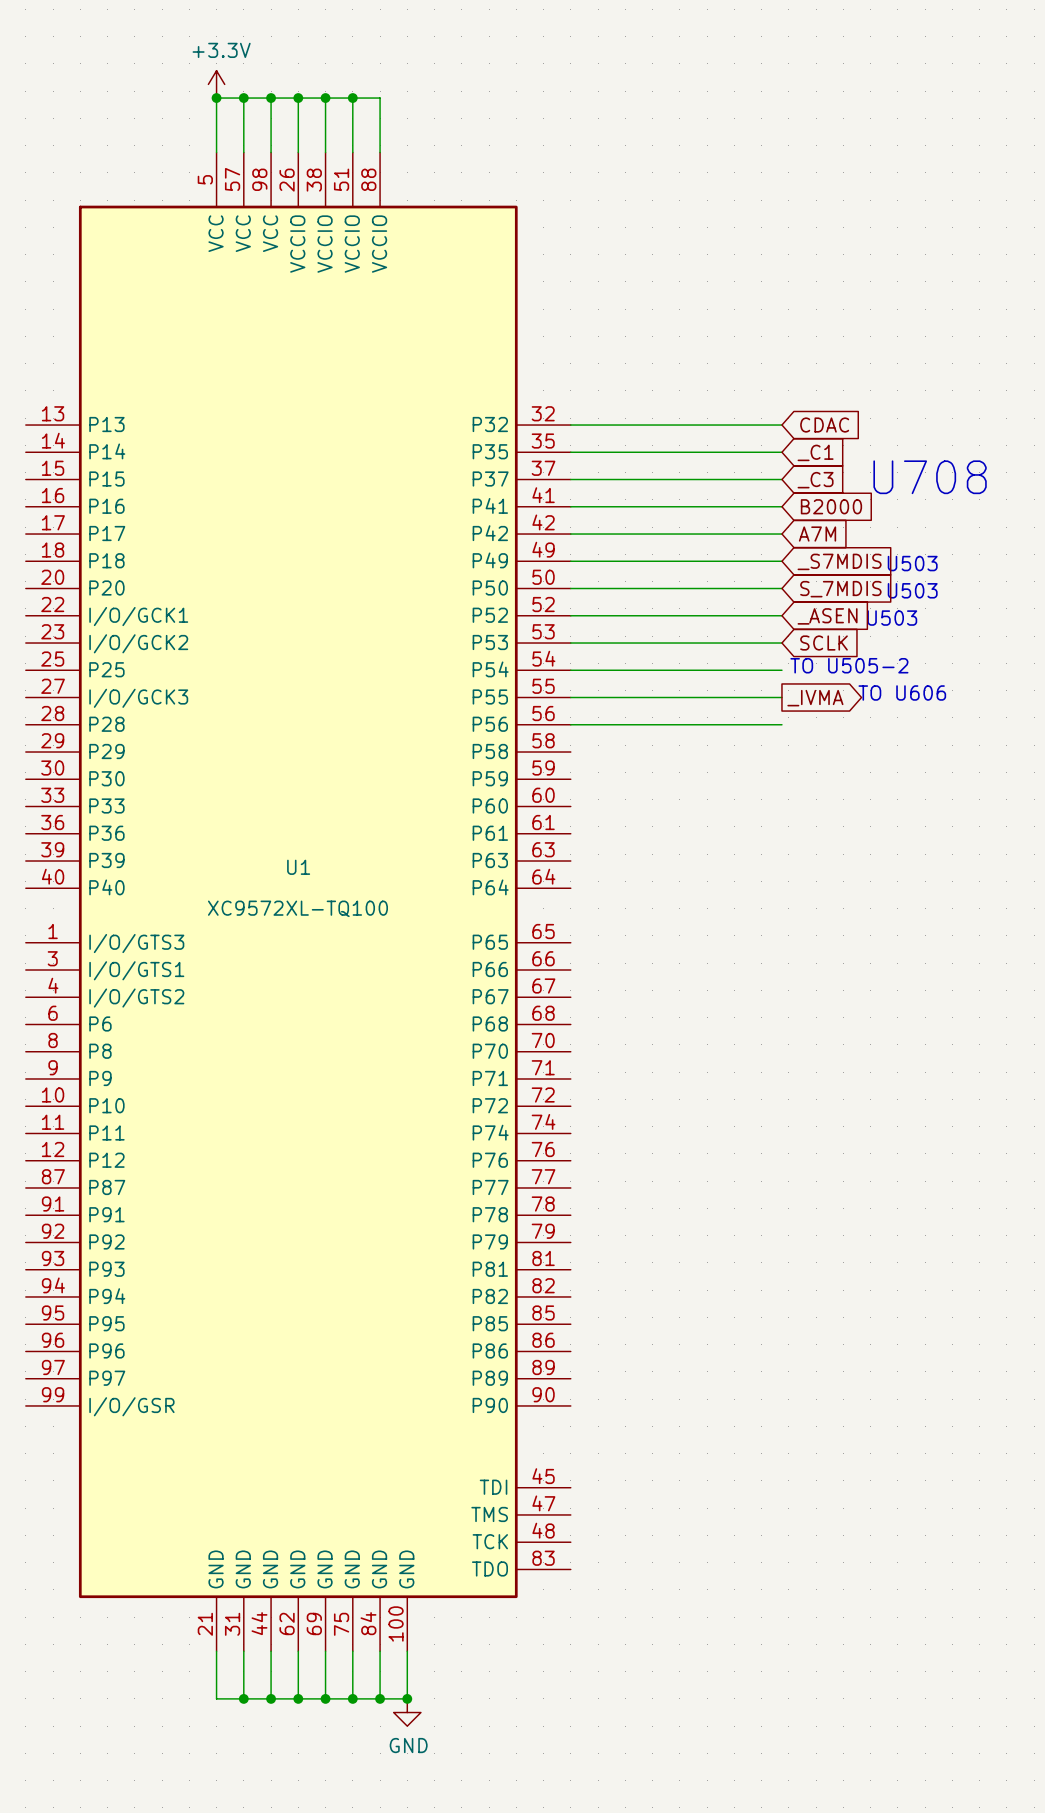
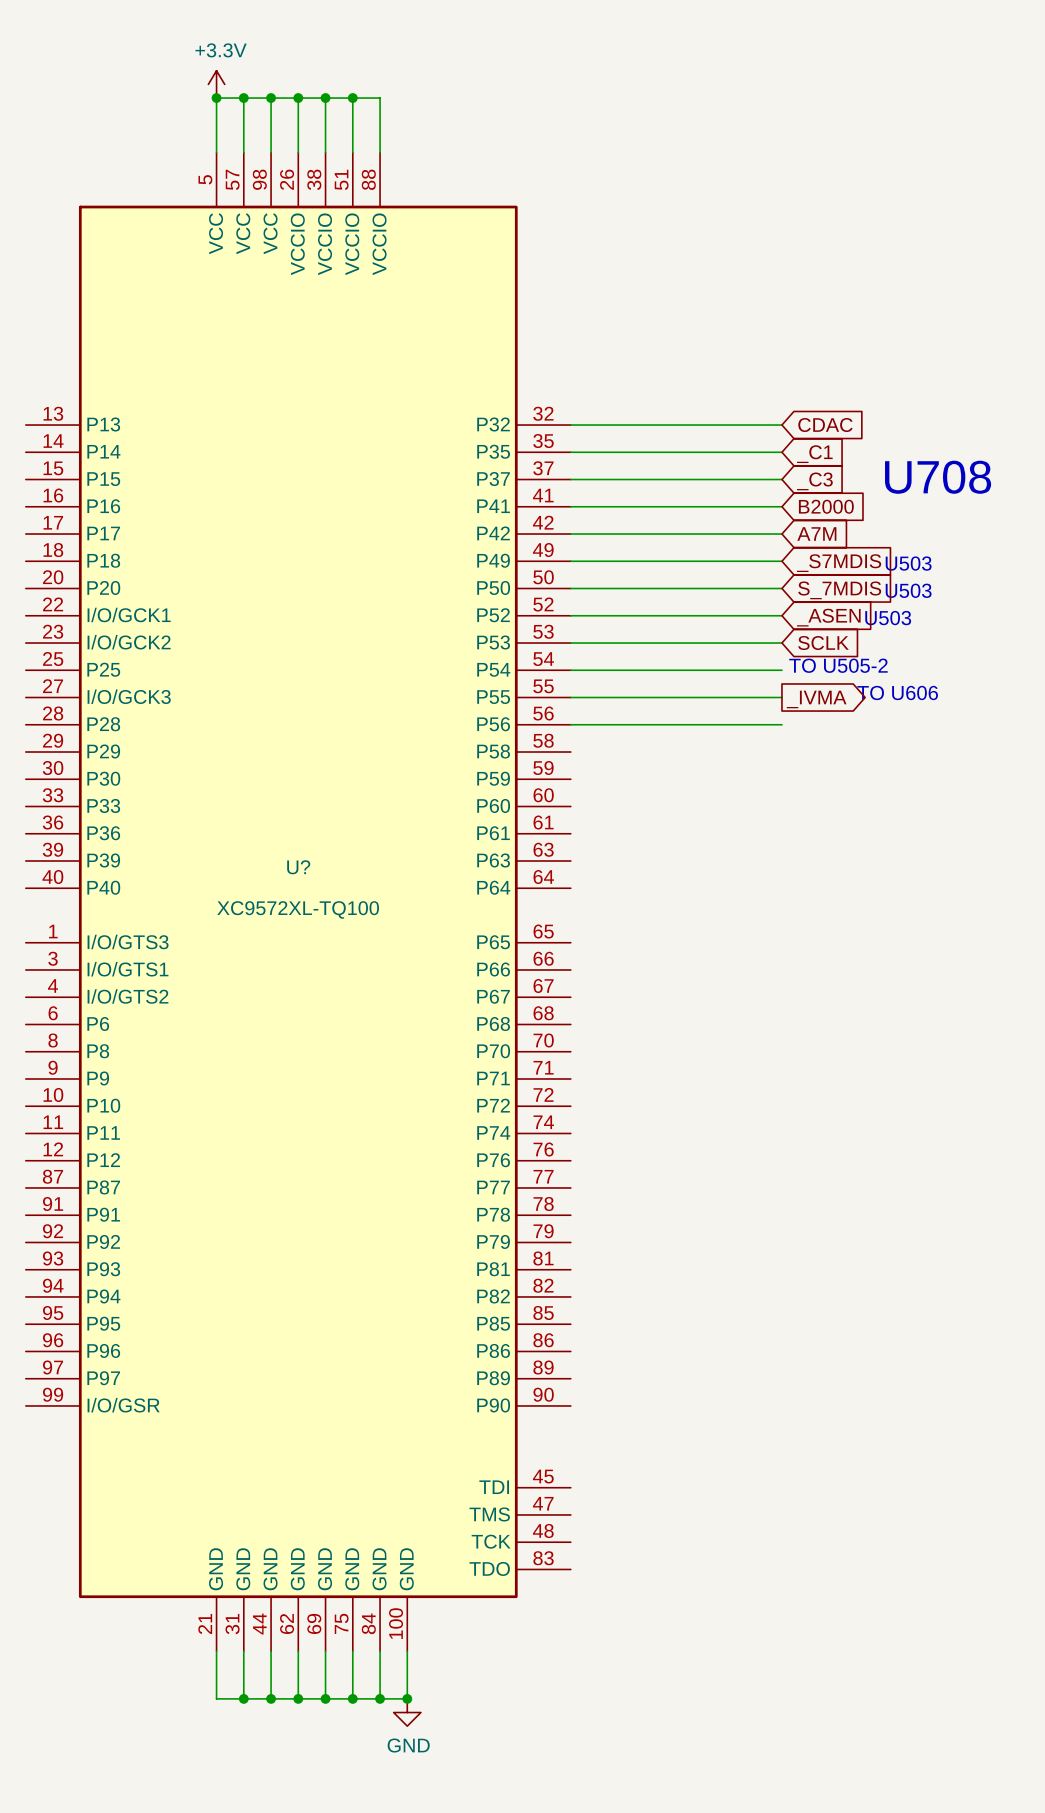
U1 name: U1 (298, 867) -> U? (298, 867)

